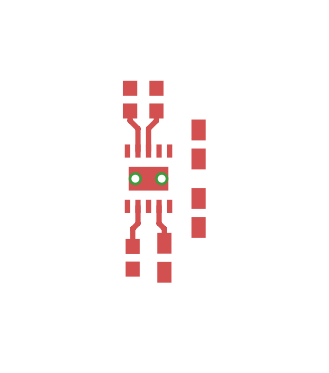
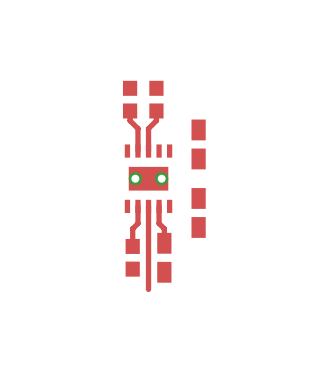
top track: none -> (148, 206) (148, 289)

